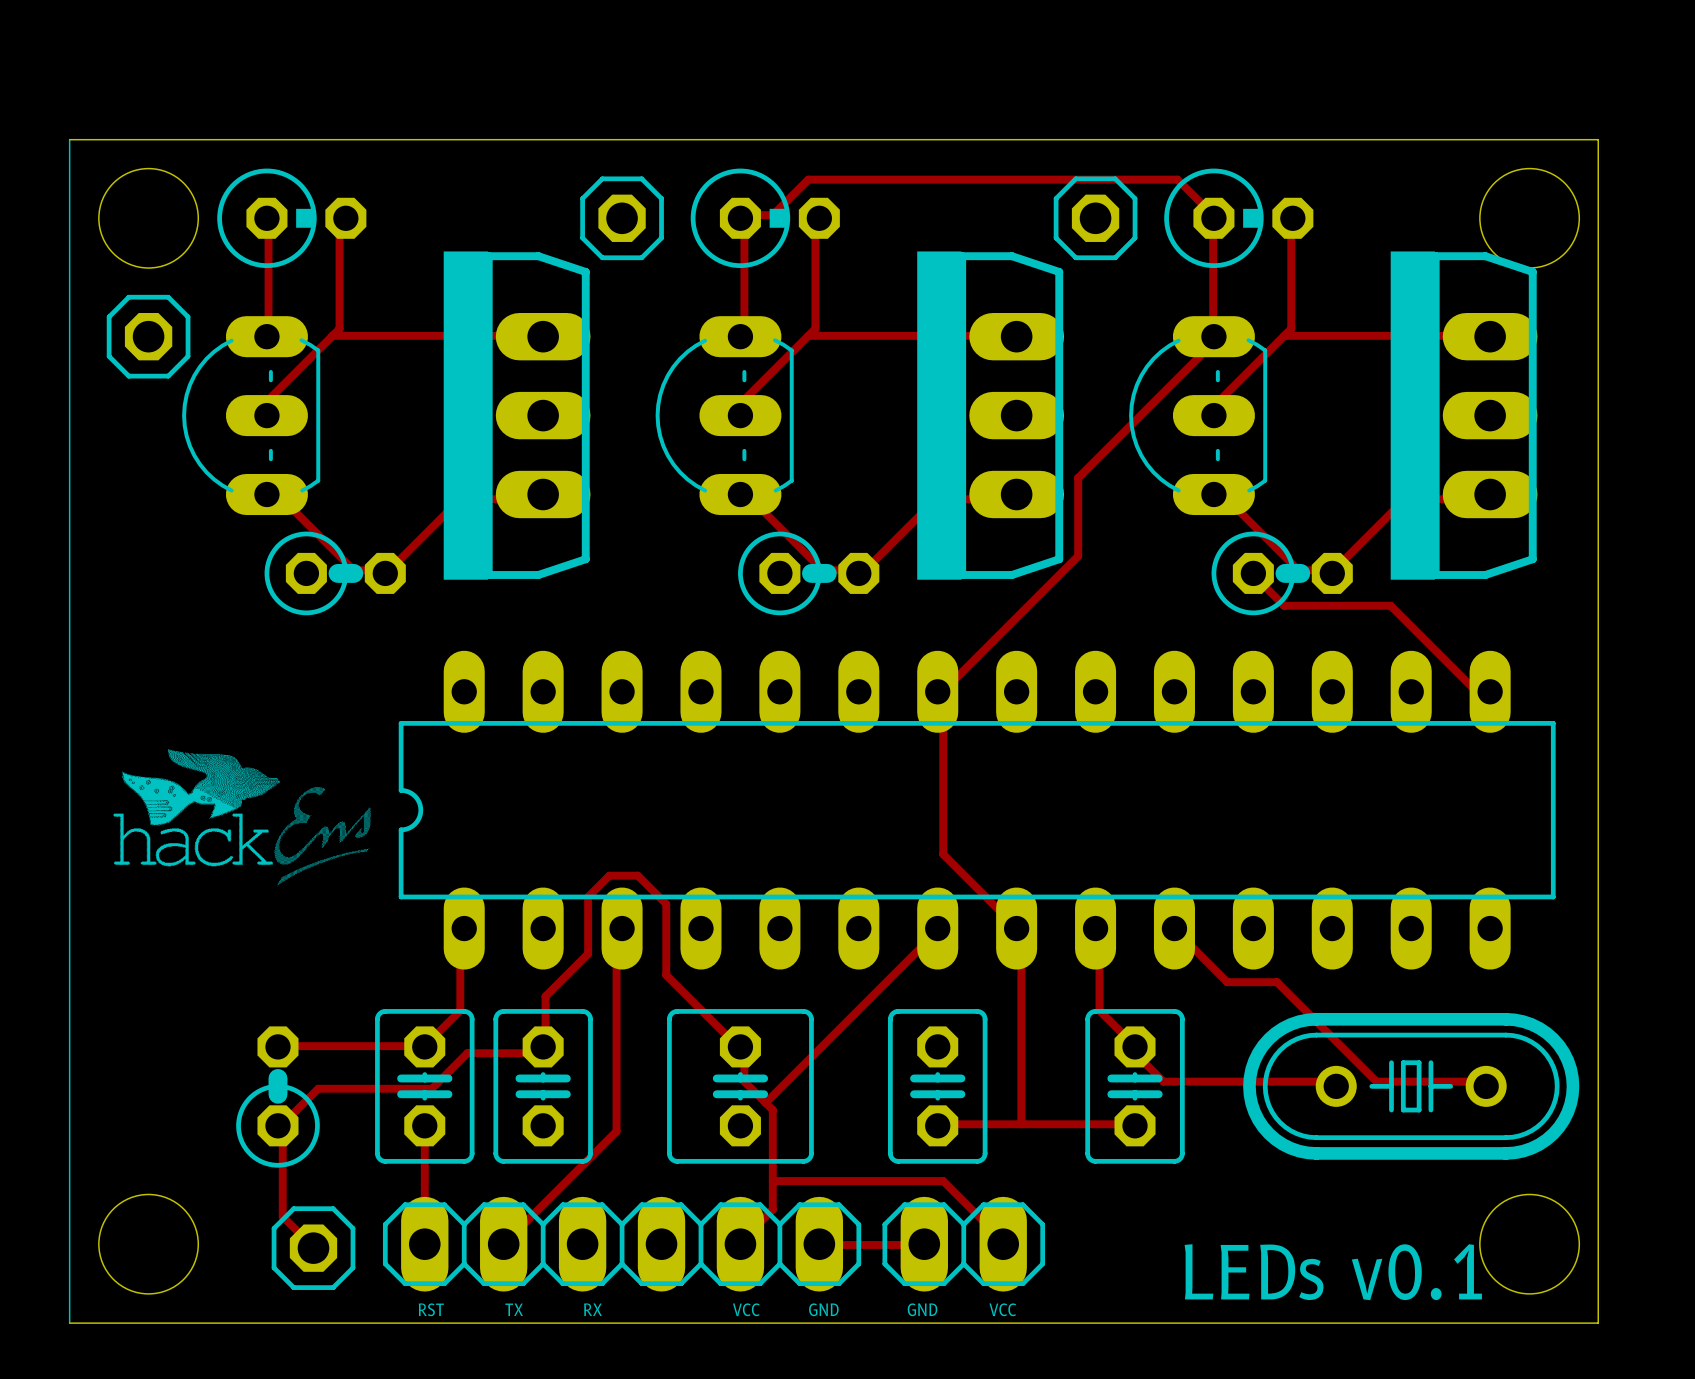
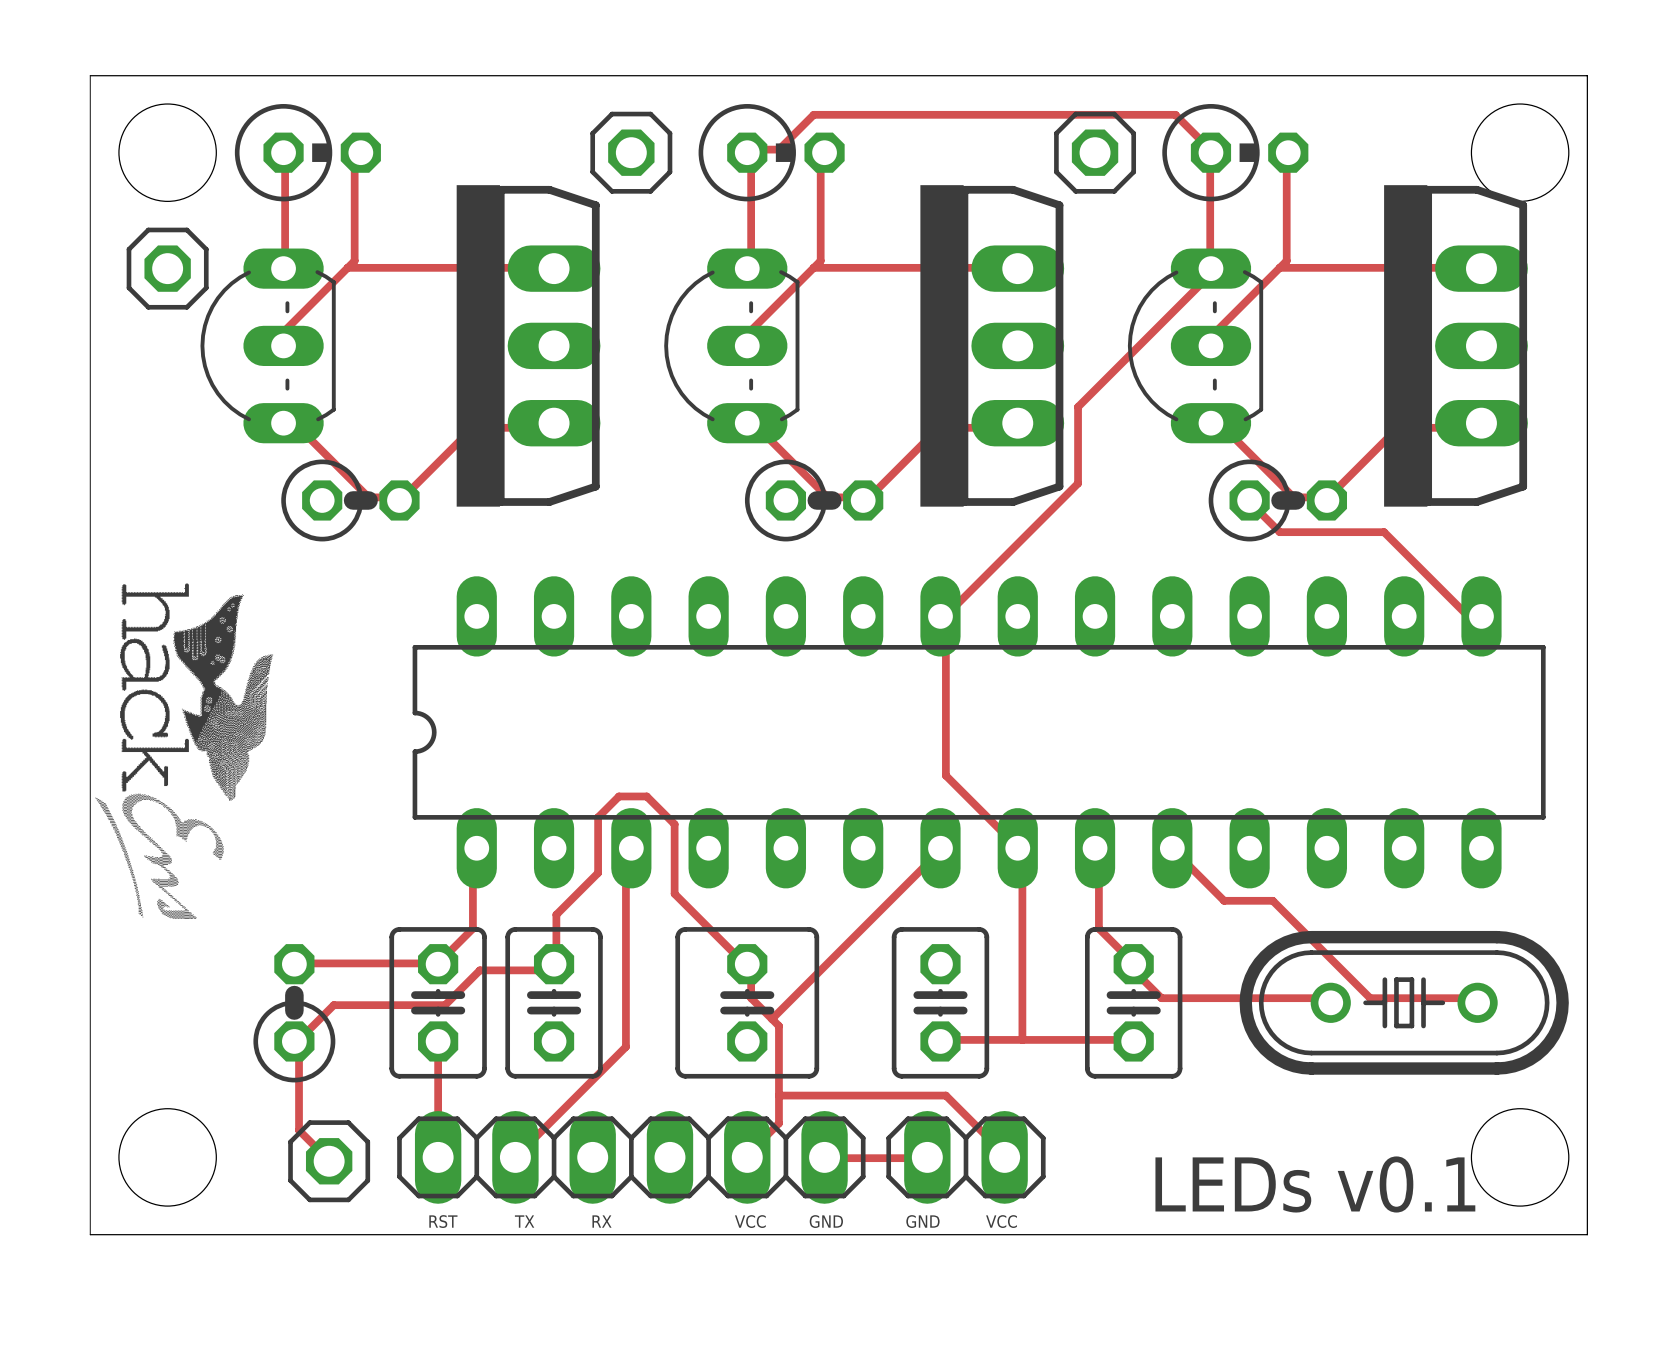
drawing: none -> [95, 583, 274, 919]
drawing: [113, 749, 371, 886] -> none

